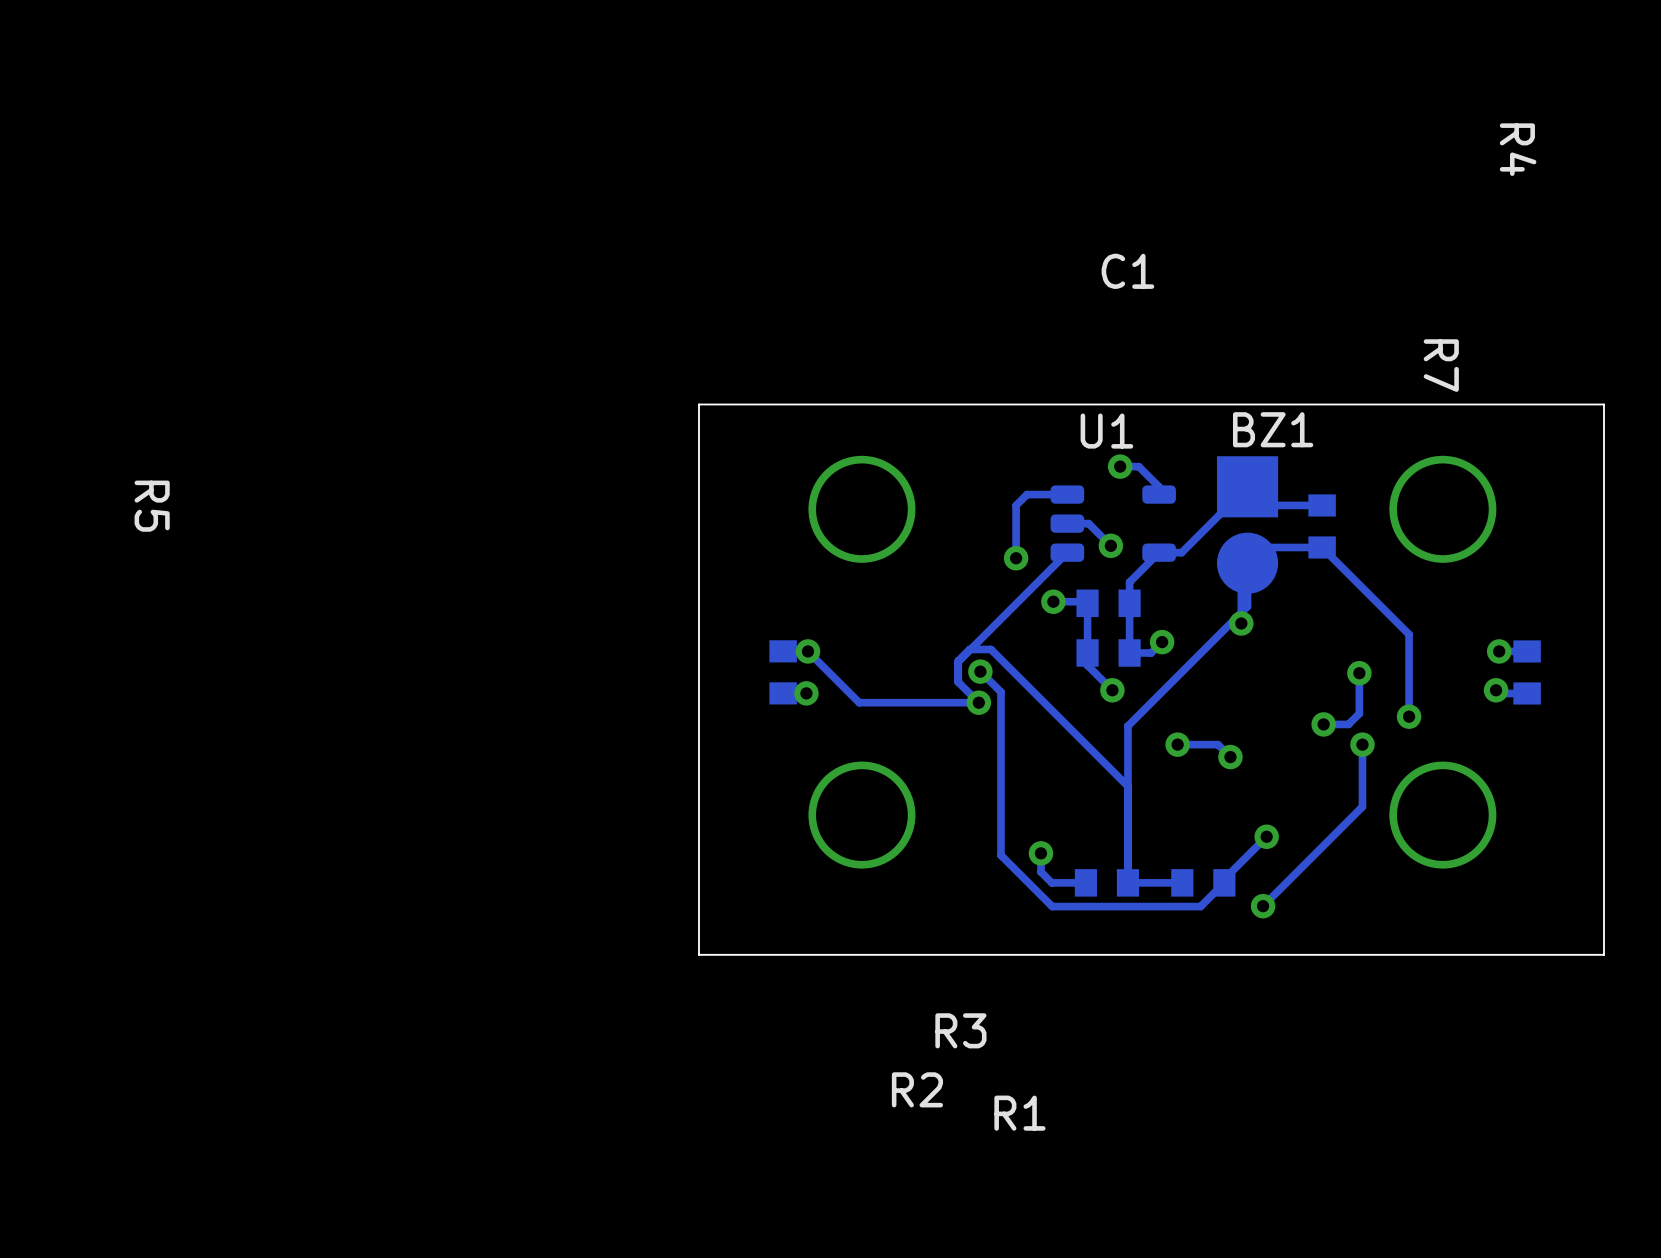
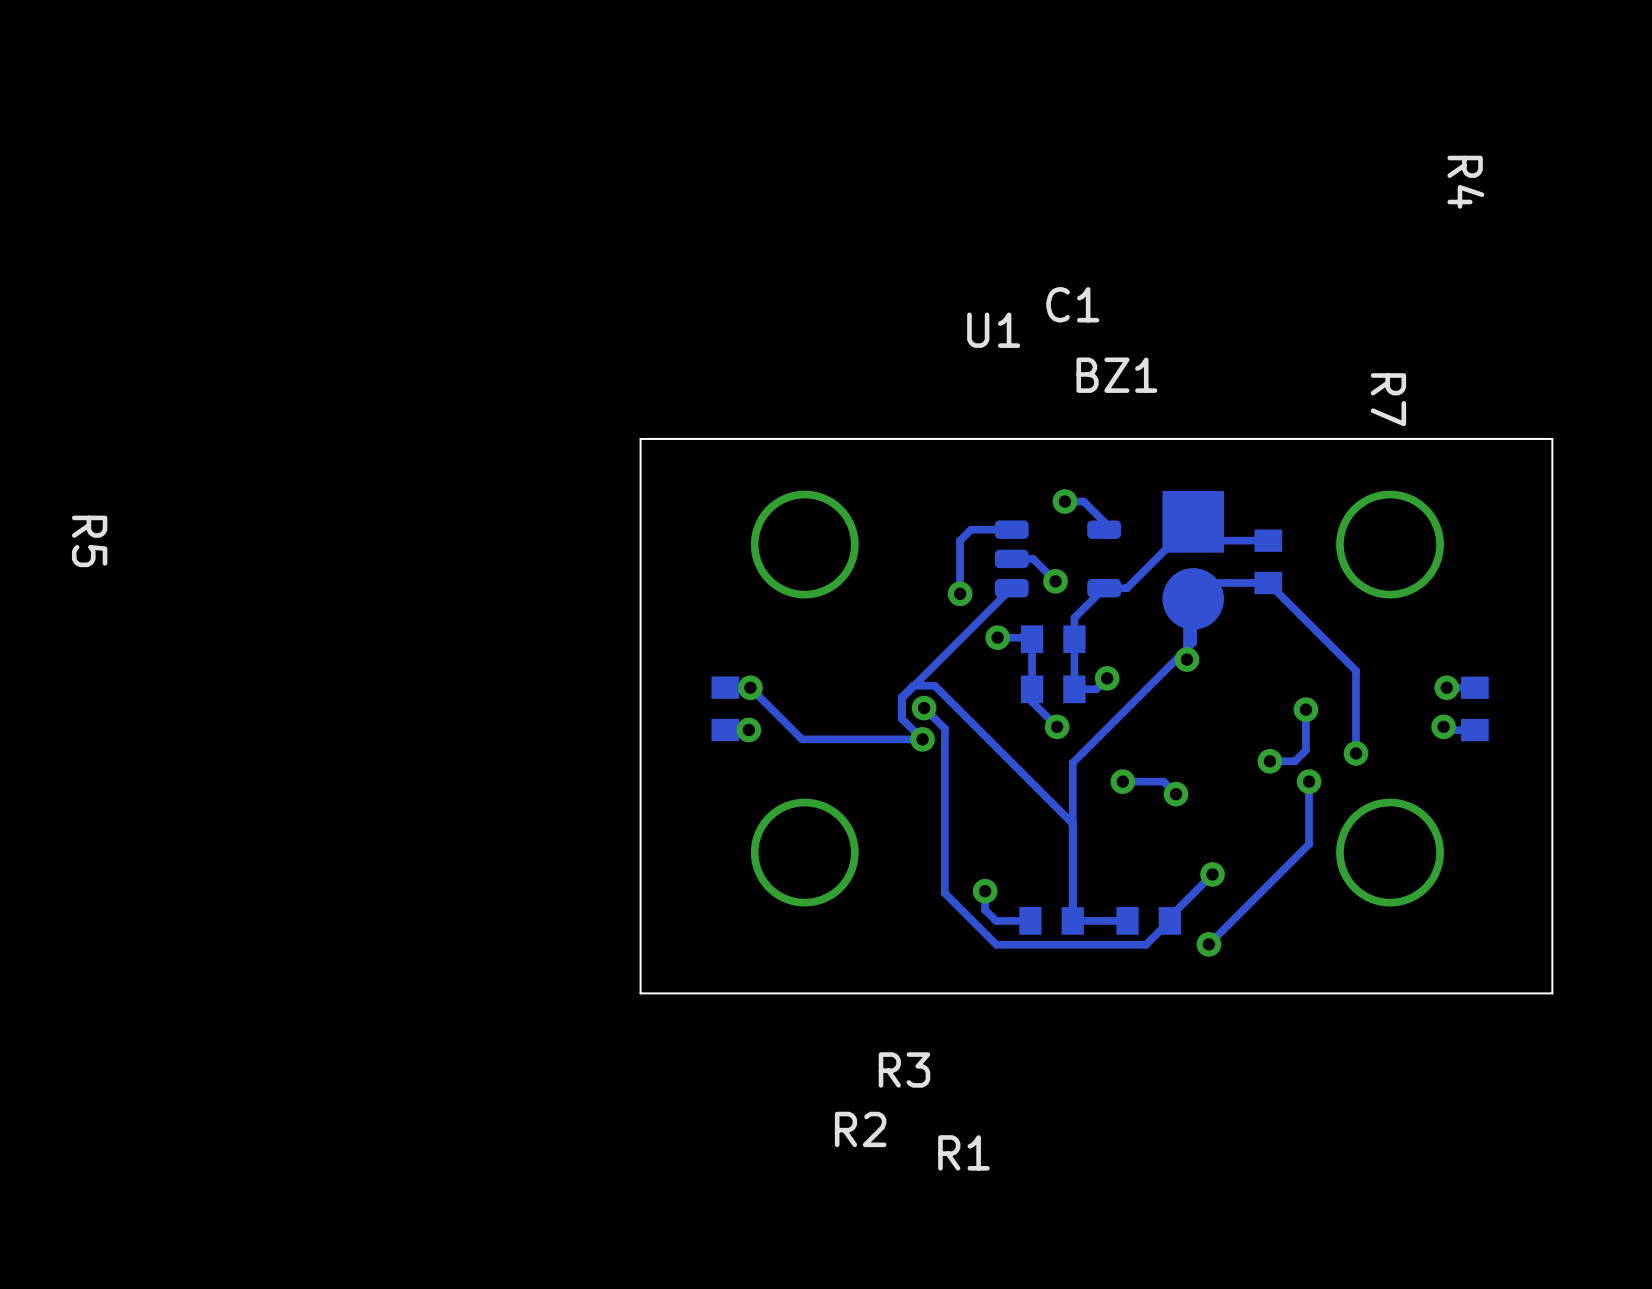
BZ1 name position: BZ1 (1273, 429) -> BZ1 (1116, 375)
U1 name position: U1 (1106, 431) -> U1 (993, 330)

